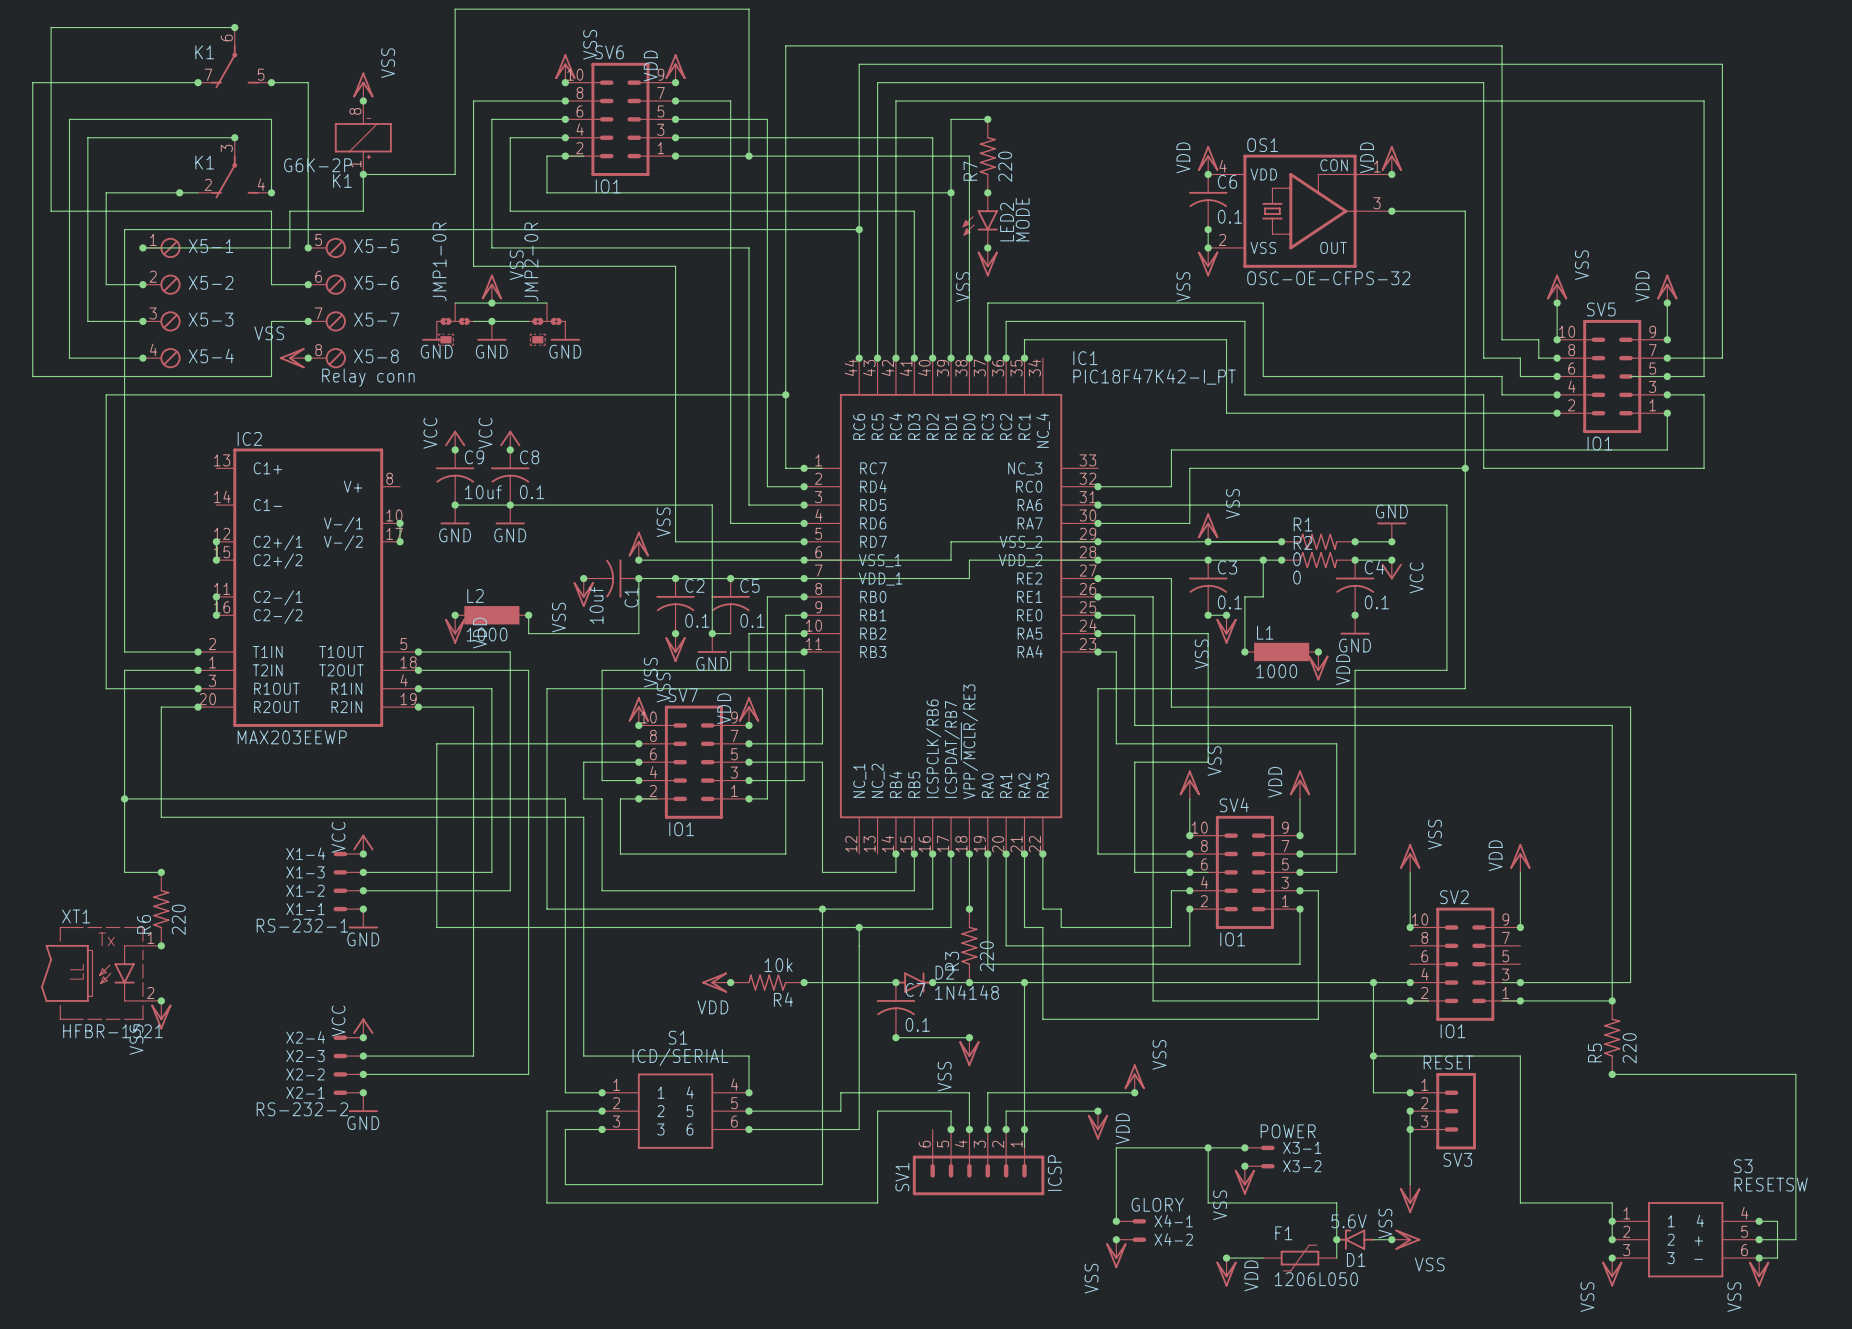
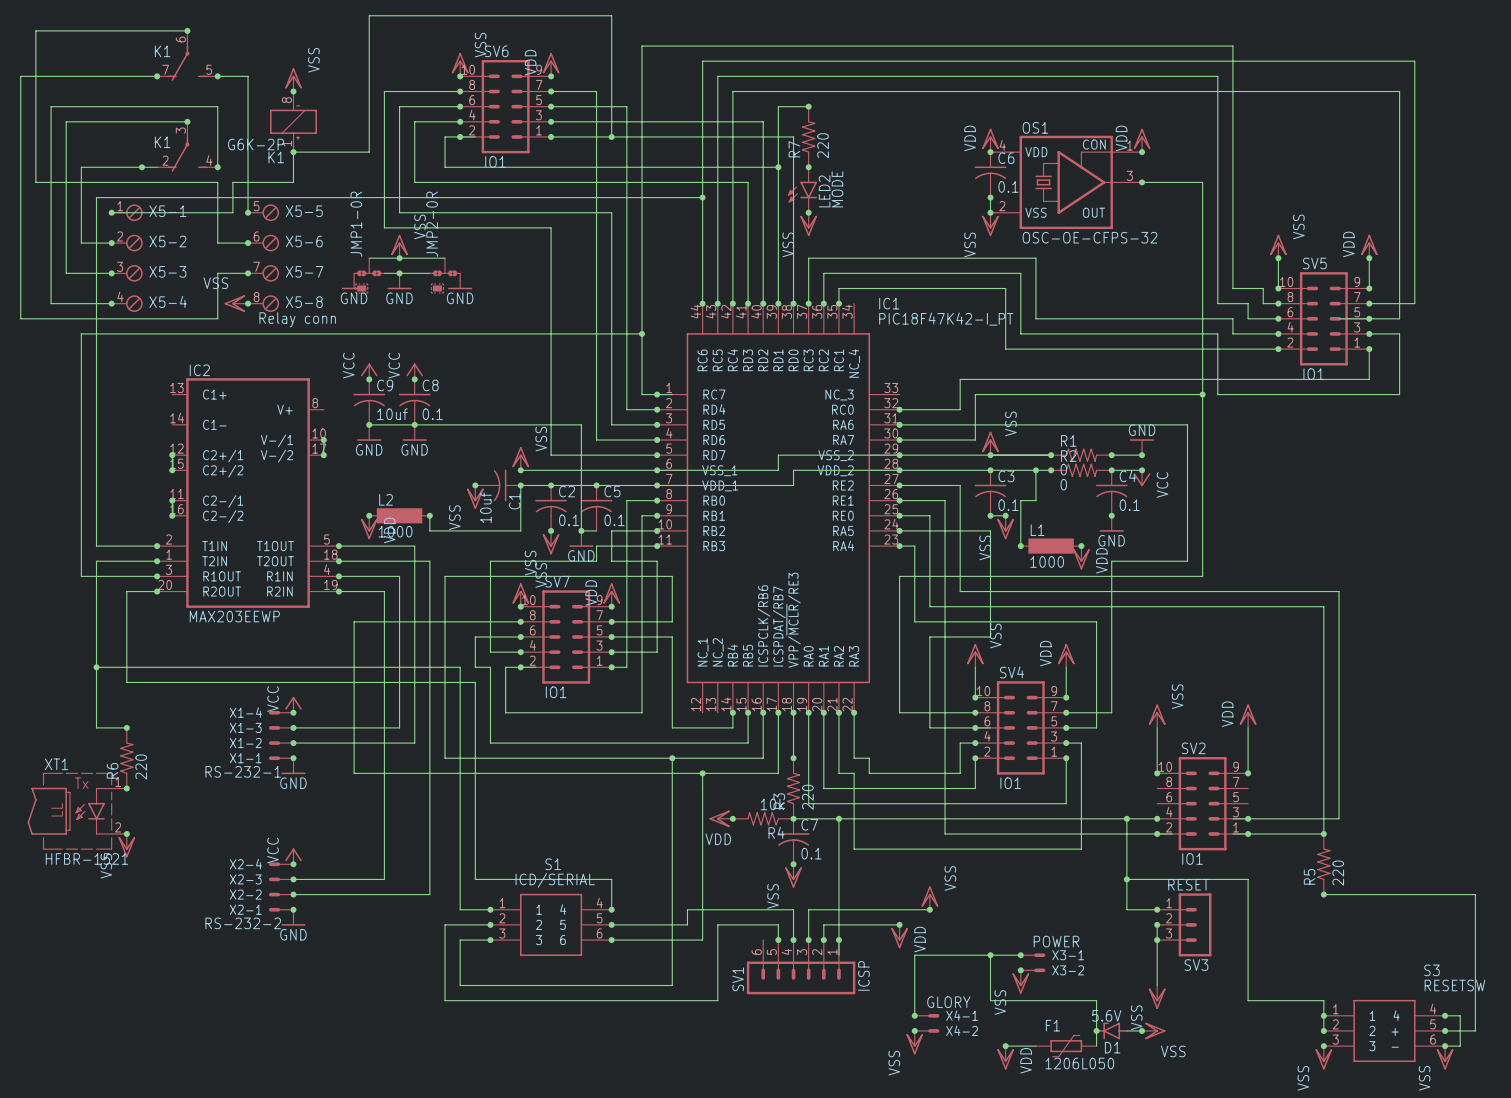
power symbol position: VDD (716, 982) -> VDD (721, 818)
junction: (730, 982) -> none
R4 position: (767, 982) -> (763, 818)
wire: (804, 982) (895, 982) -> none
junction: (804, 982) -> none
D2: 1N4148 (914, 982) -> none
junction: (932, 982) -> none
C7 position: (895, 1010) -> (793, 841)
wire: (895, 1037) (969, 1037) -> none
junction: (895, 1037) -> none

